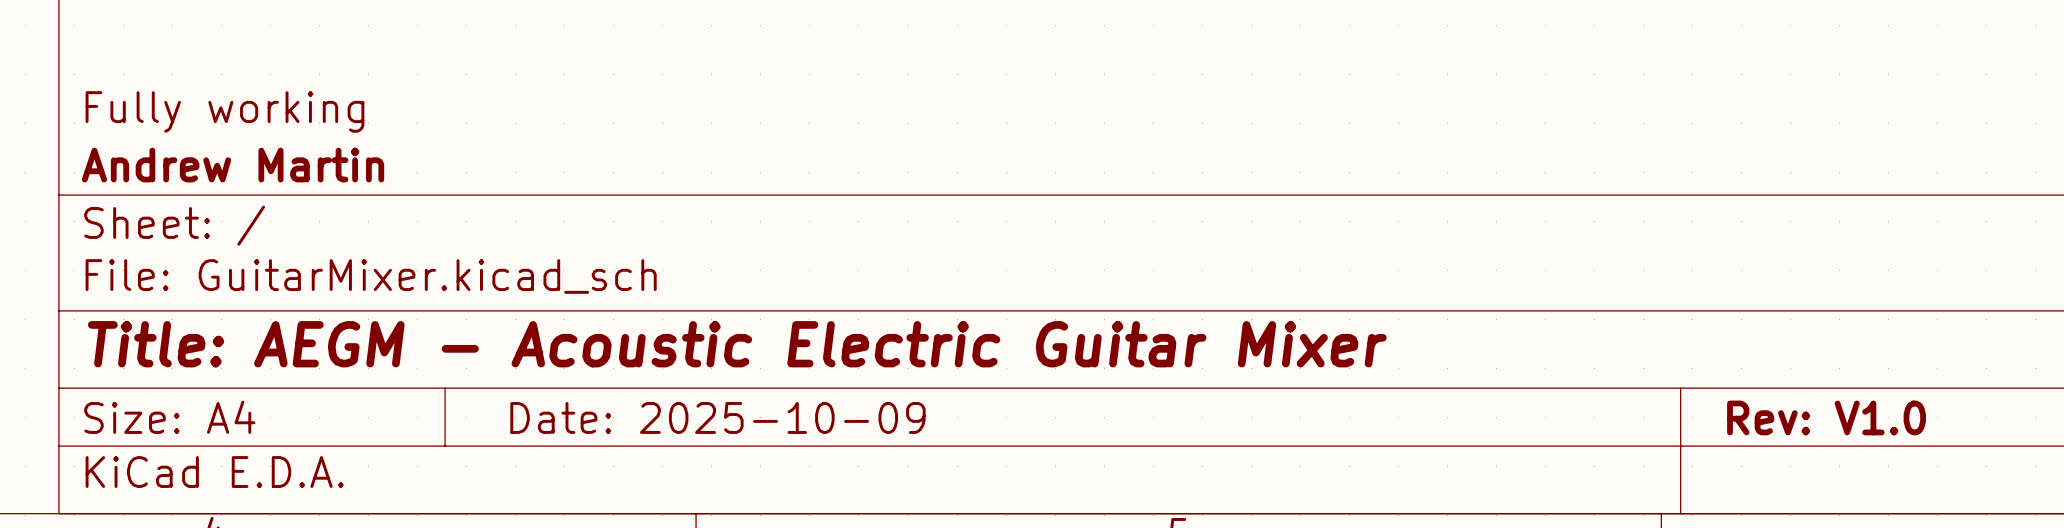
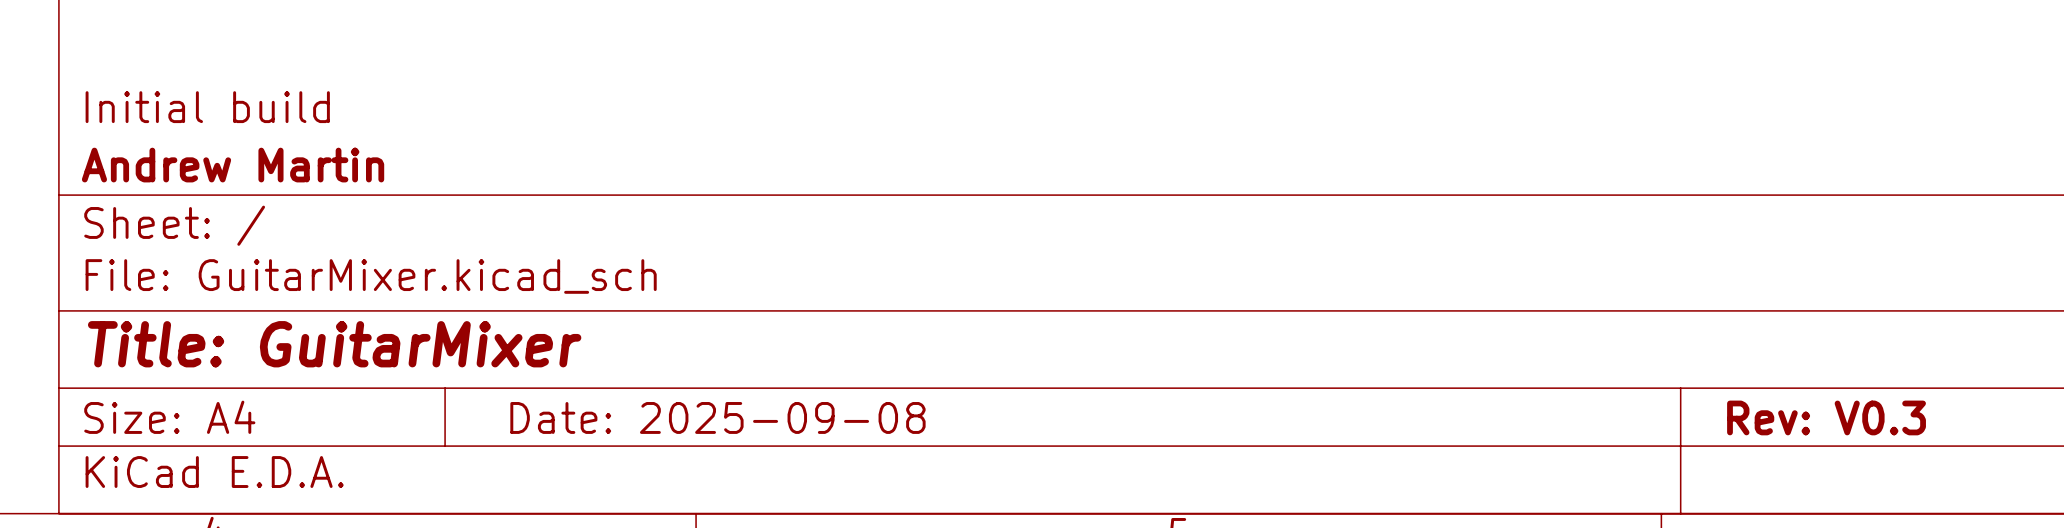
title block: Fully working (224, 111) -> Initial build (207, 107)
title block: Title: AEGM - Acoustic Electric Guitar Mixer (737, 344) -> Title: GuitarMixer (334, 344)
title block: Date: 2025-10-09 (717, 417) -> Date: 2025-09-08 (717, 417)
title block: Rev: V1.0 (1826, 417) -> Rev: V0.3 (1826, 417)

